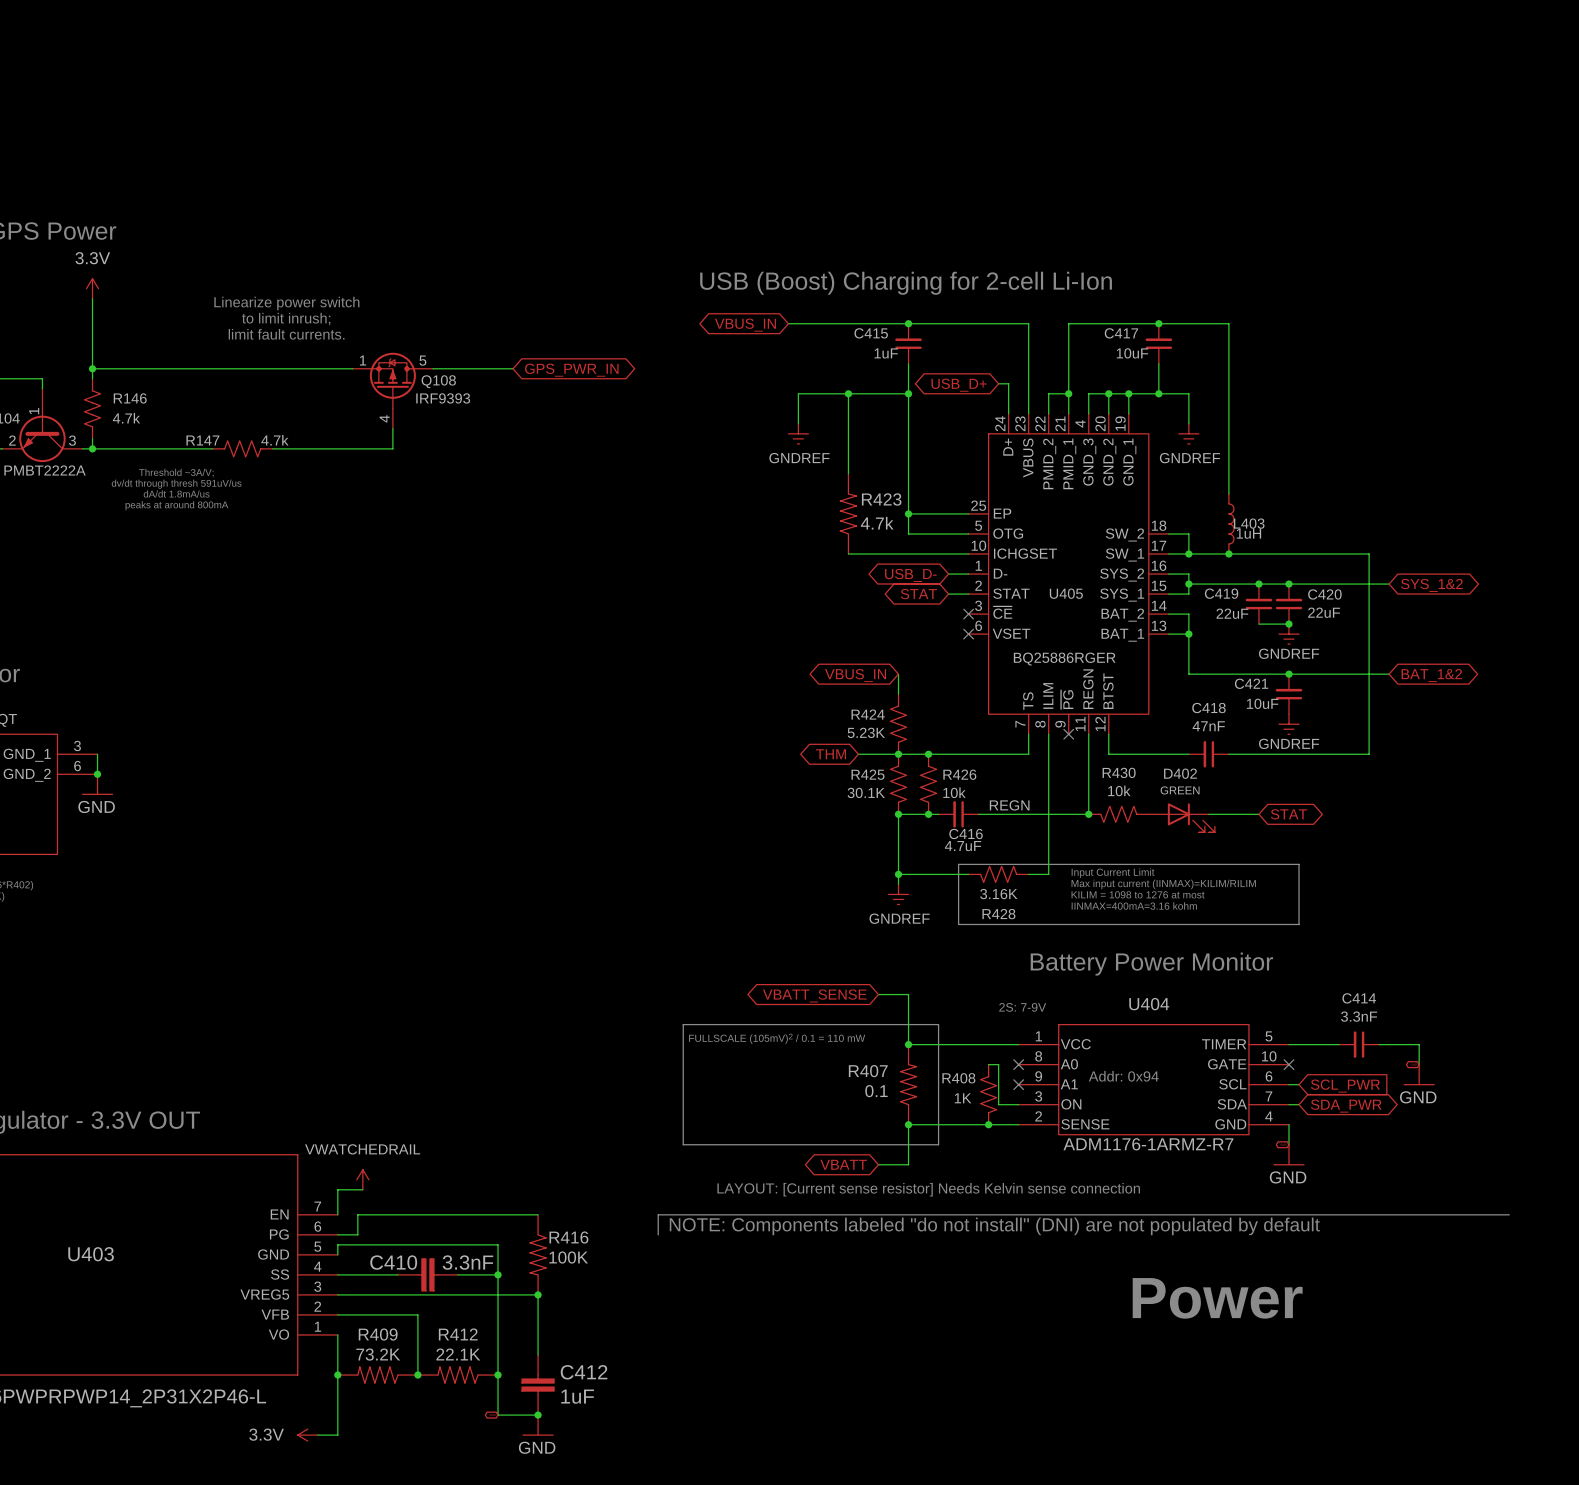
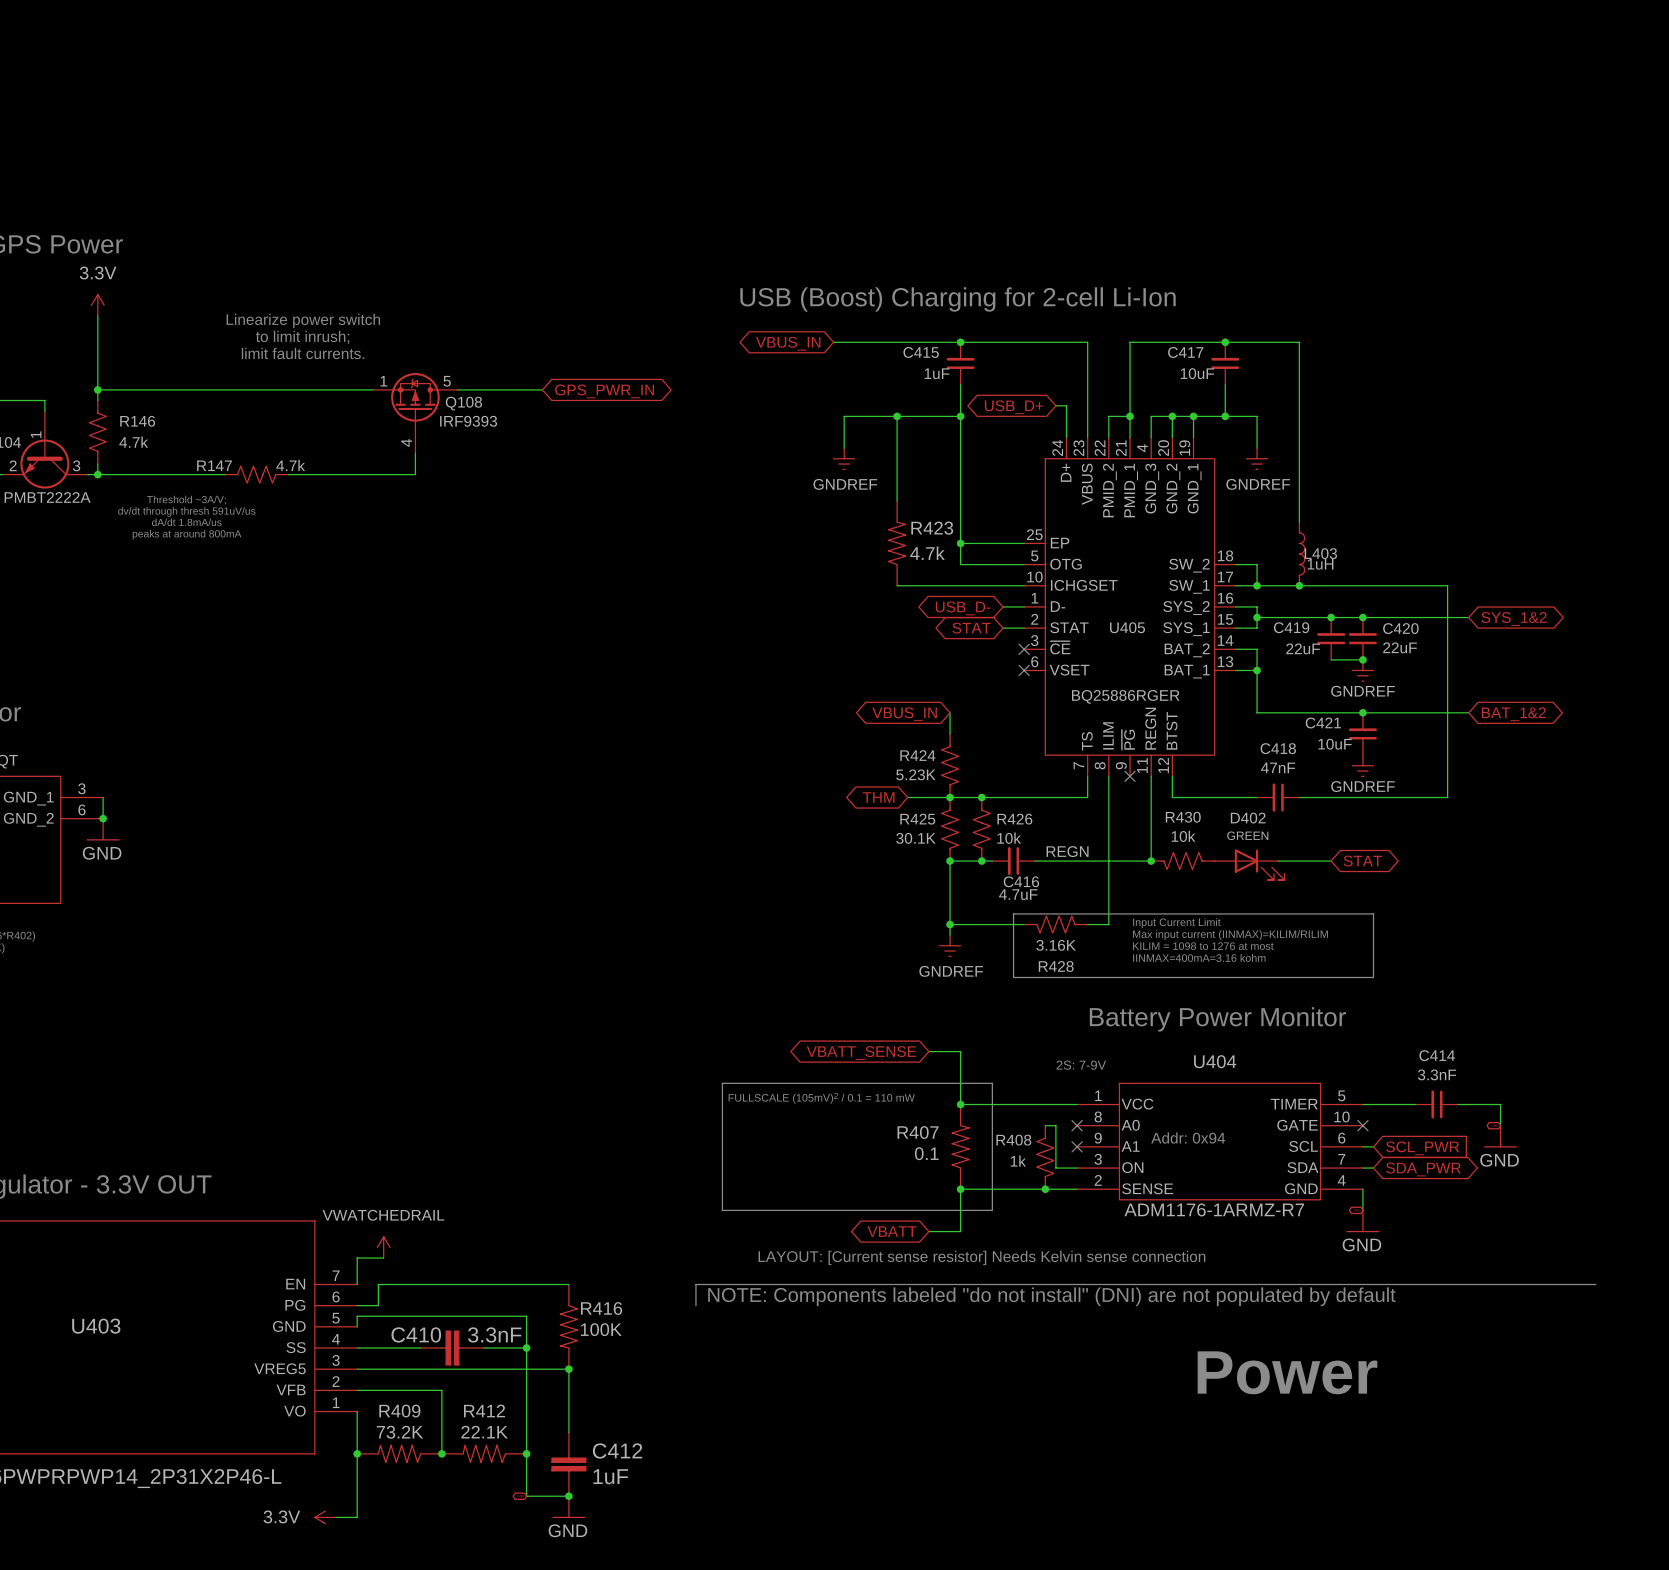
R408 value: 1K (963, 1098) -> 1k (1018, 1161)

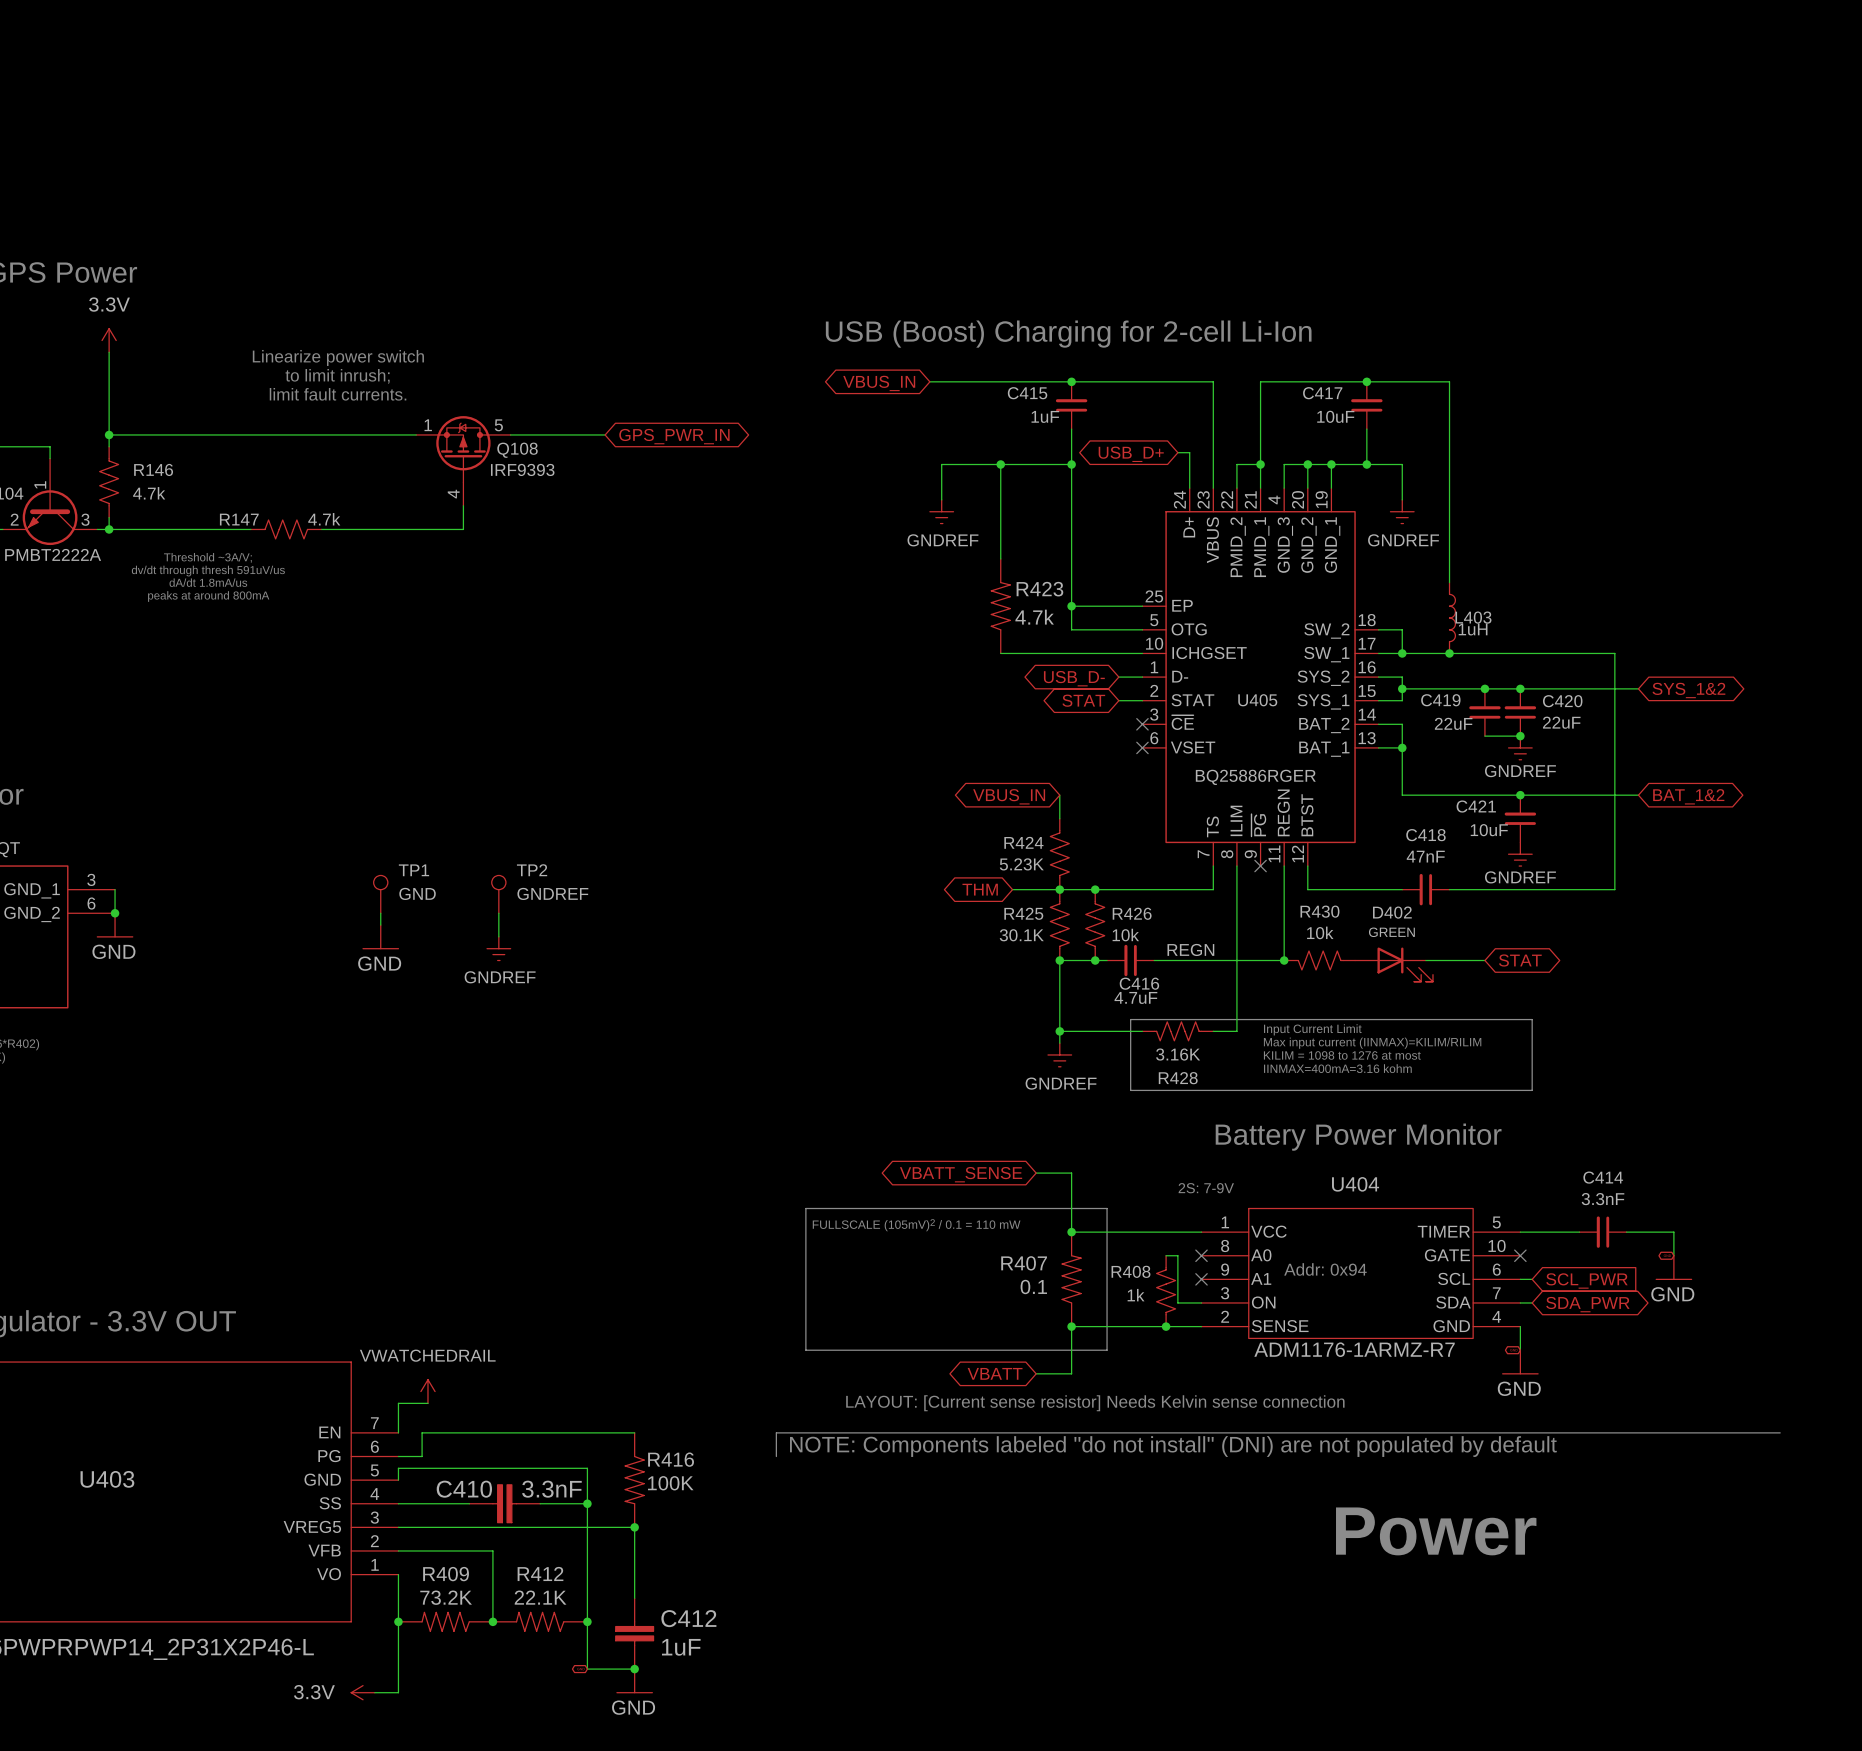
TP1: none -> GND (380, 894)
TP2: none -> GNDREF (498, 894)
wire: none -> (380, 913) (380, 925)
wire: none -> (498, 913) (498, 936)
power symbol: none -> GND (380, 936)
power symbol: none -> GNDREF (498, 948)

